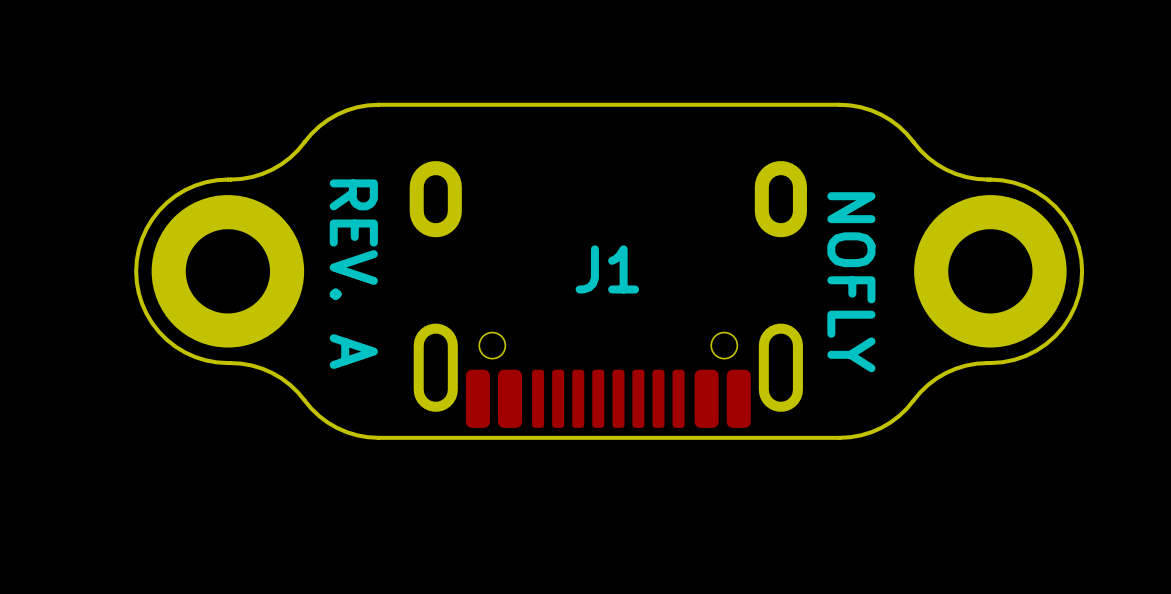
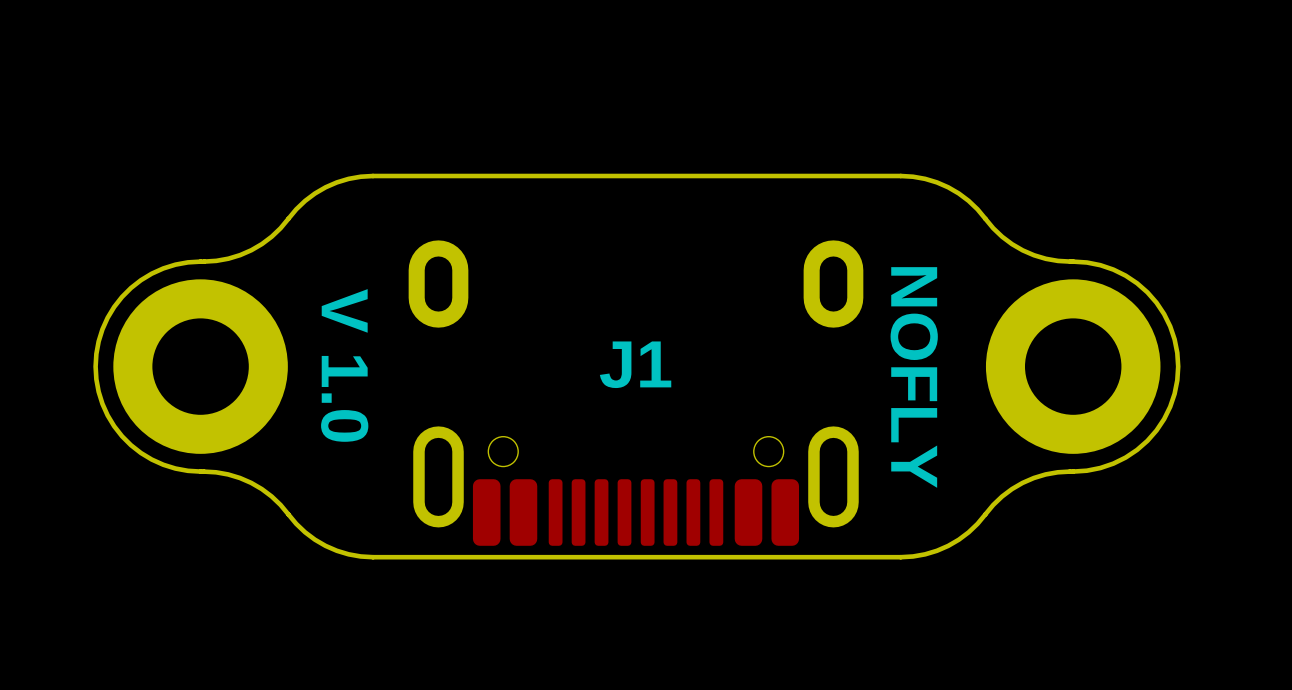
text: REV. A (353, 274) -> V 1.0 (344, 365)

